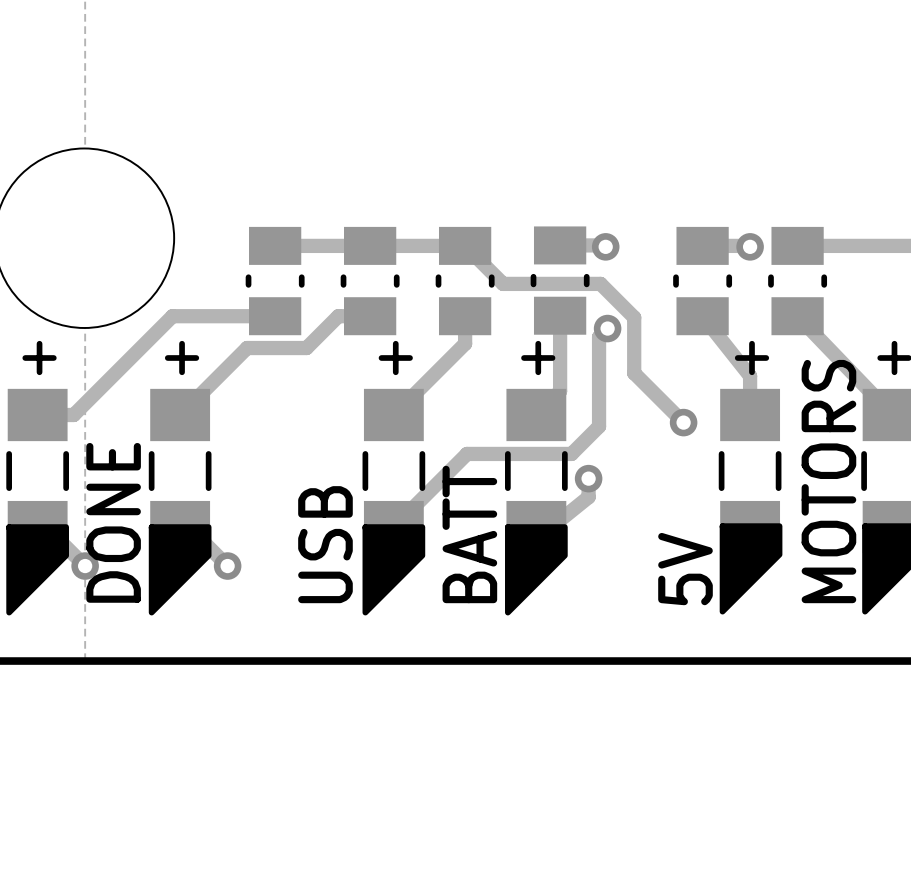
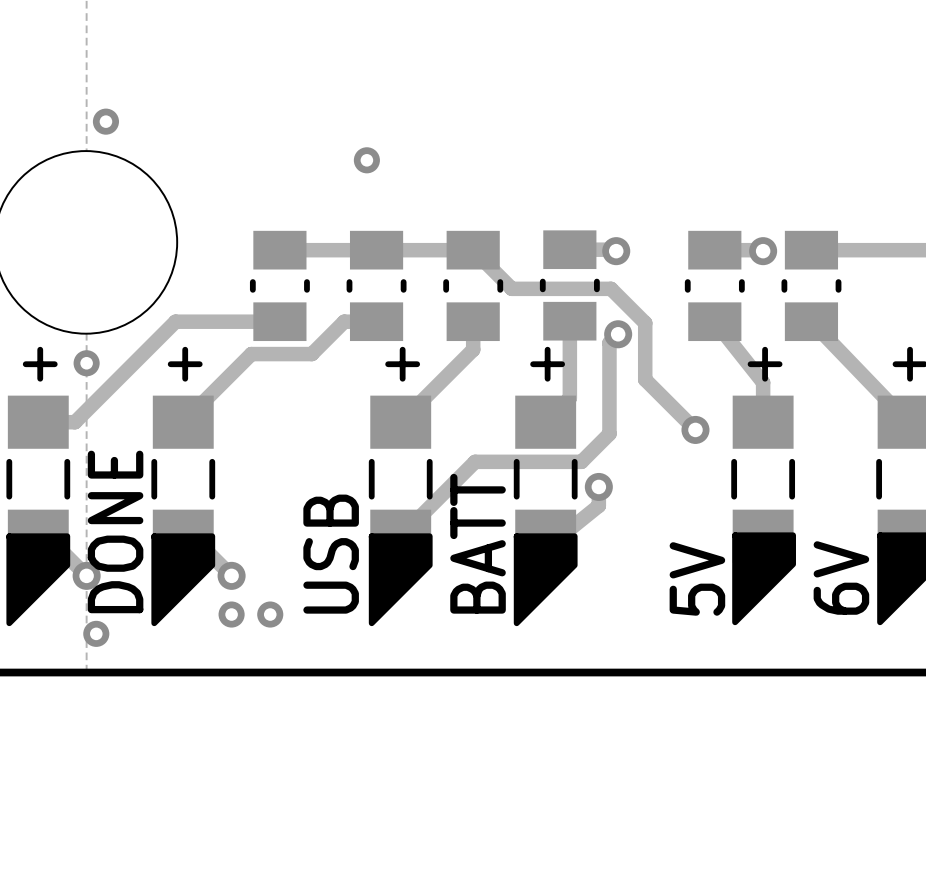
via: none -> (105, 121)
via: none -> (366, 160)
via: none -> (86, 363)
MOTORS name: MOTORS (828, 481) -> none
text: none -> 6V (841, 578)
via: none -> (231, 614)
via: none -> (270, 614)
via: none -> (96, 633)

